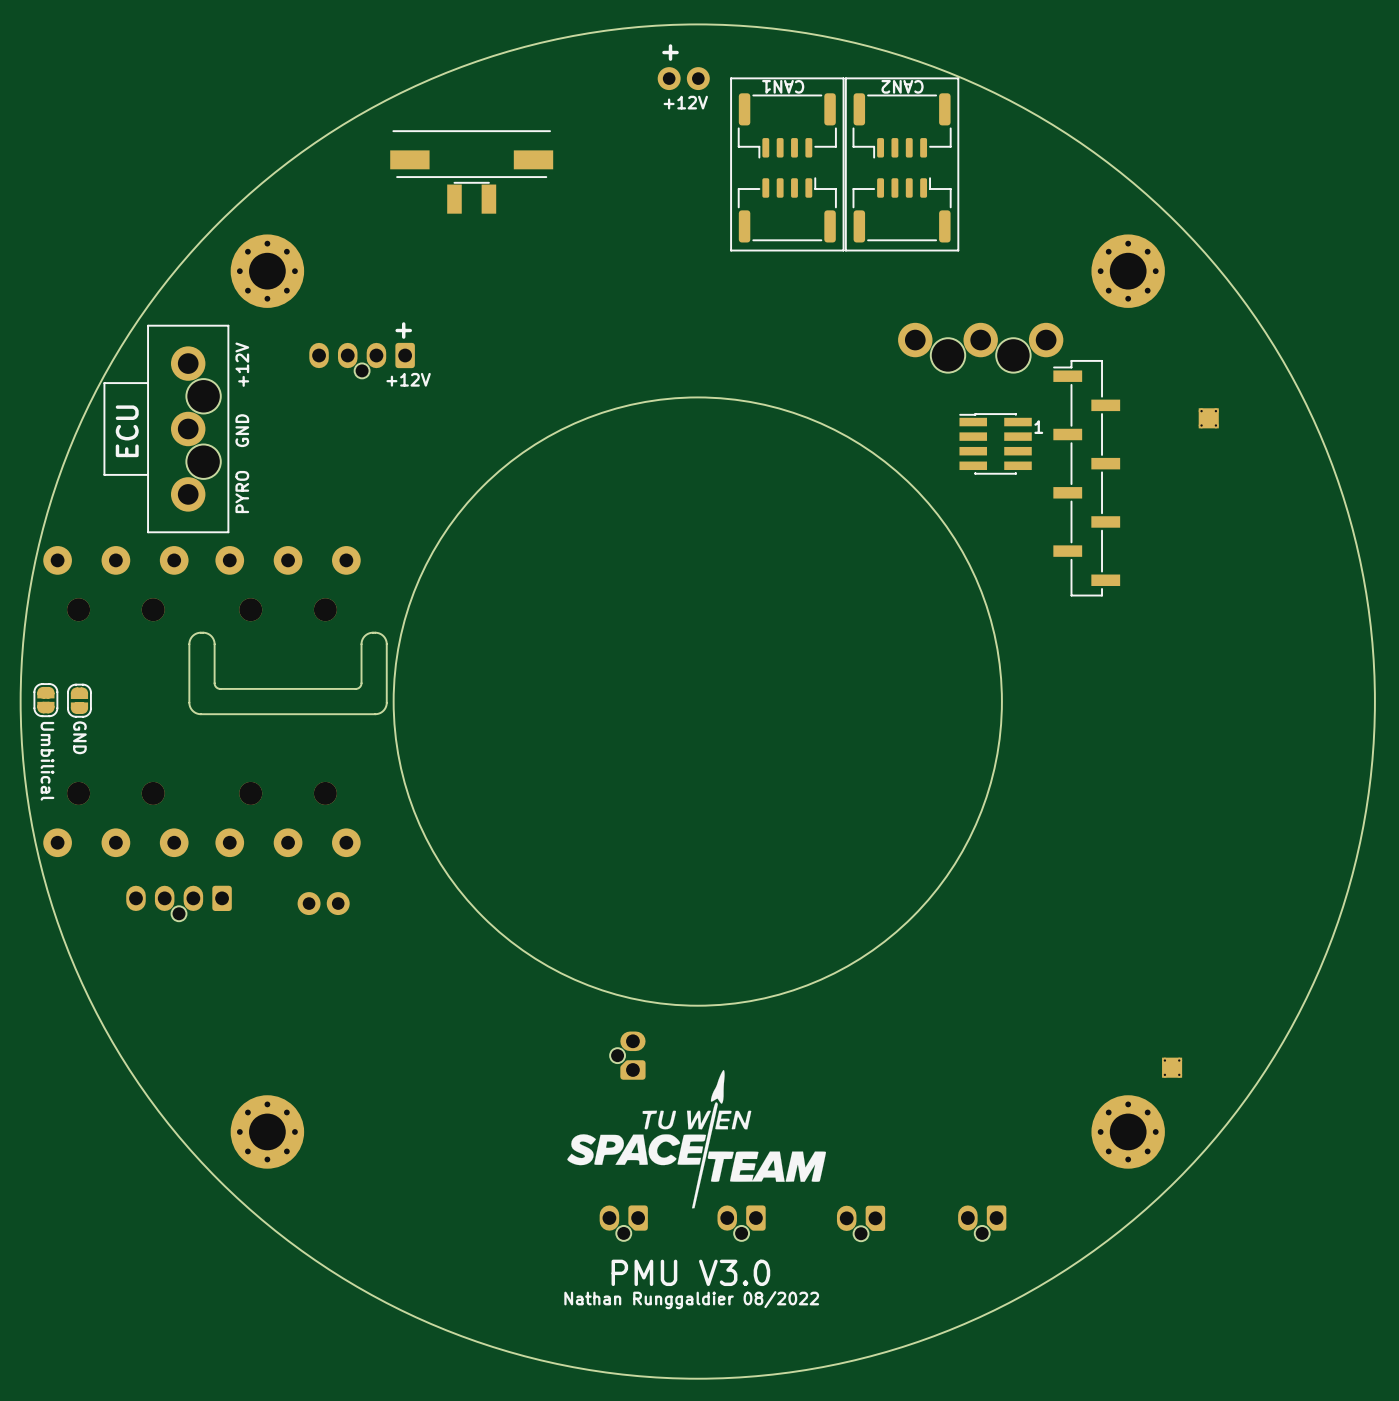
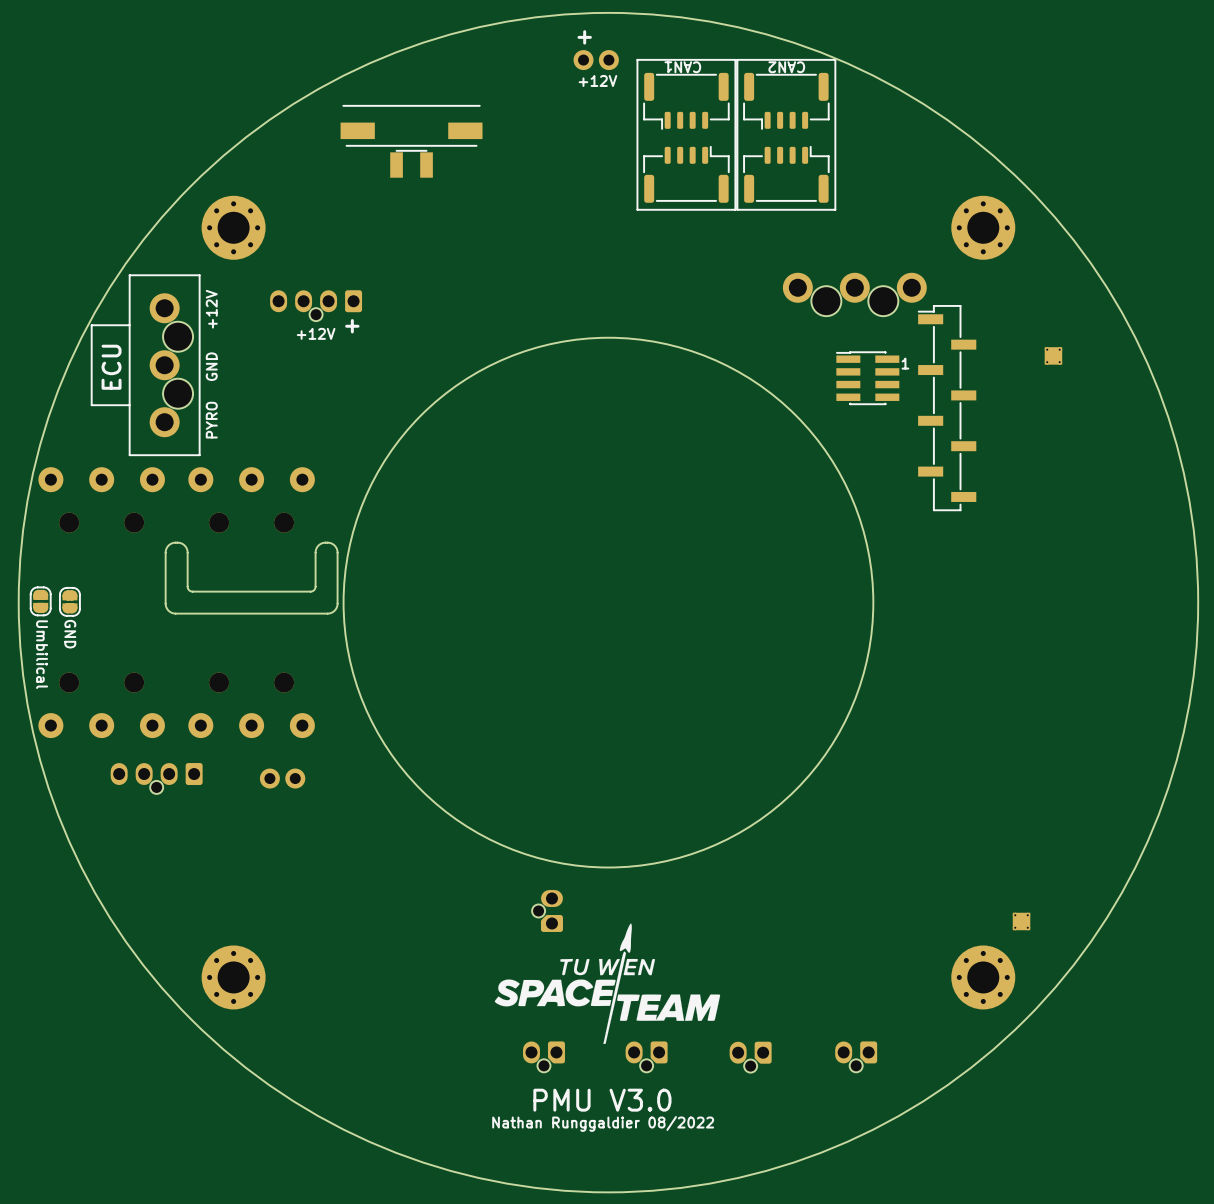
text position: + (403, 330) -> + (352, 326)
text position: +12V (408, 379) -> +12V (316, 333)

